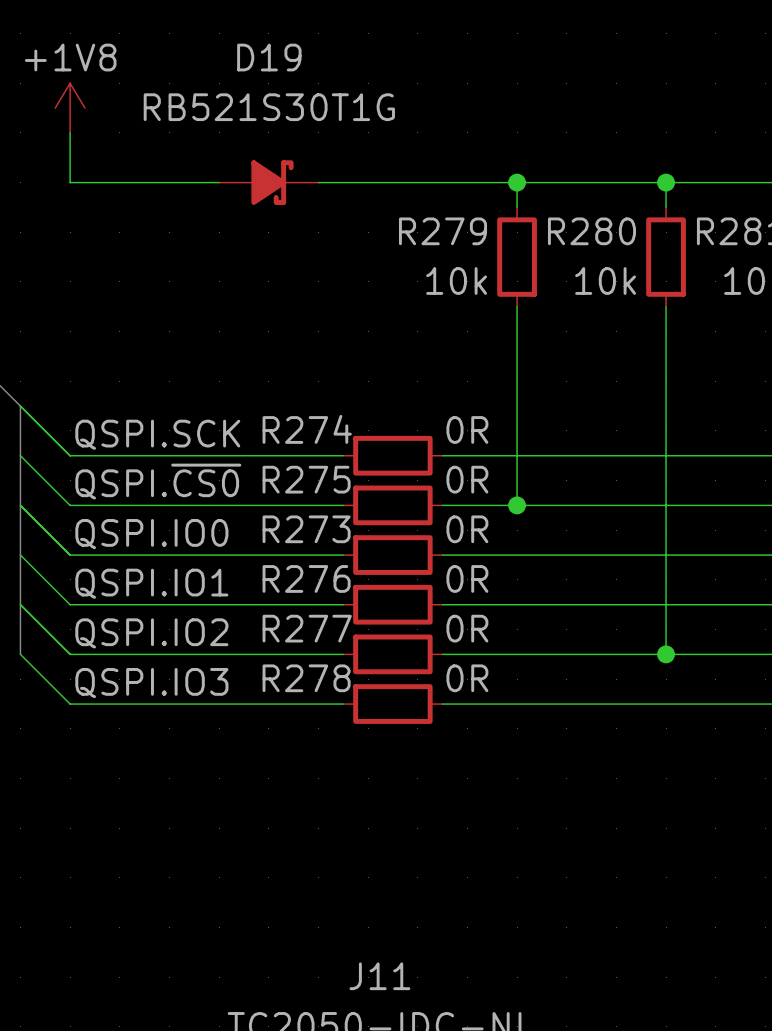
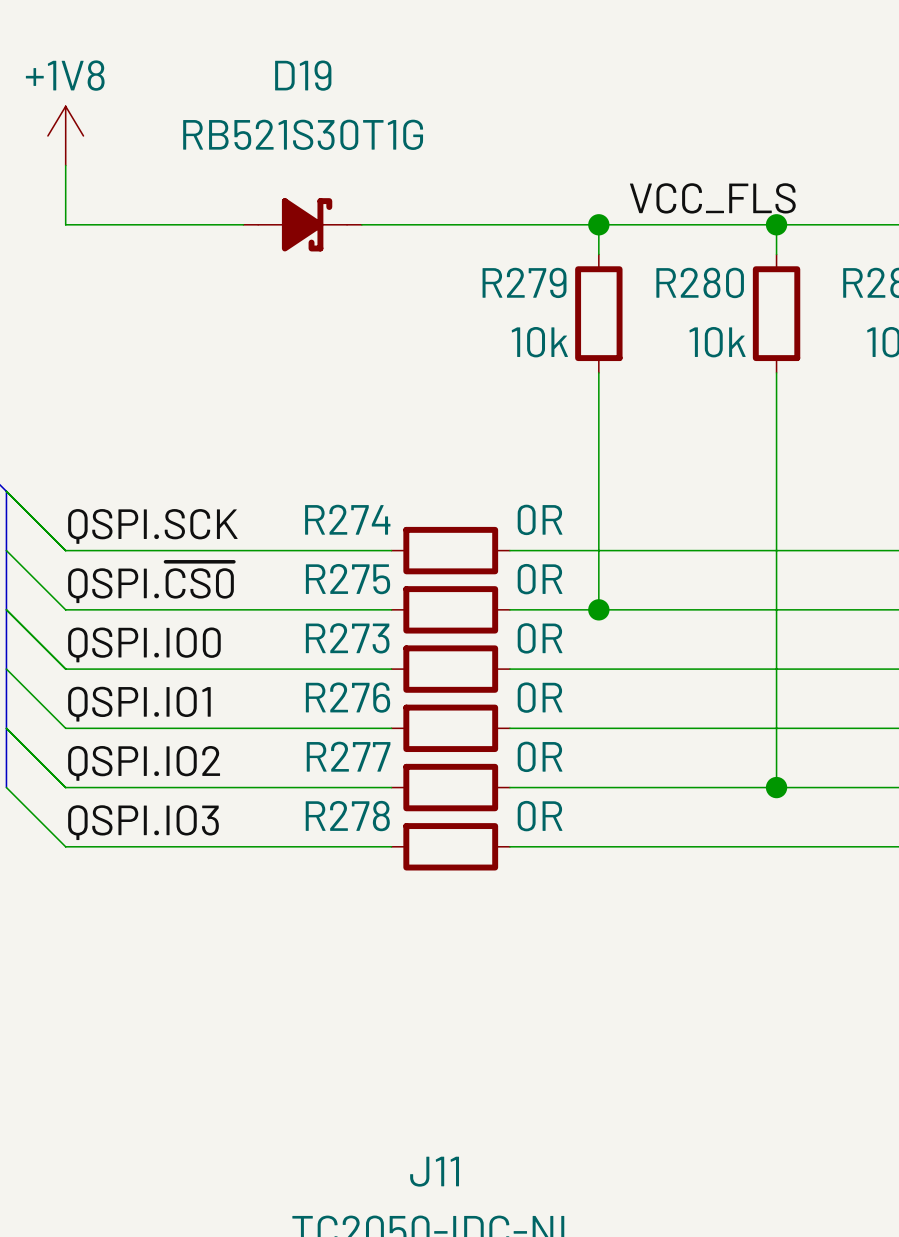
label: none -> VCC_FLS (712, 198)

